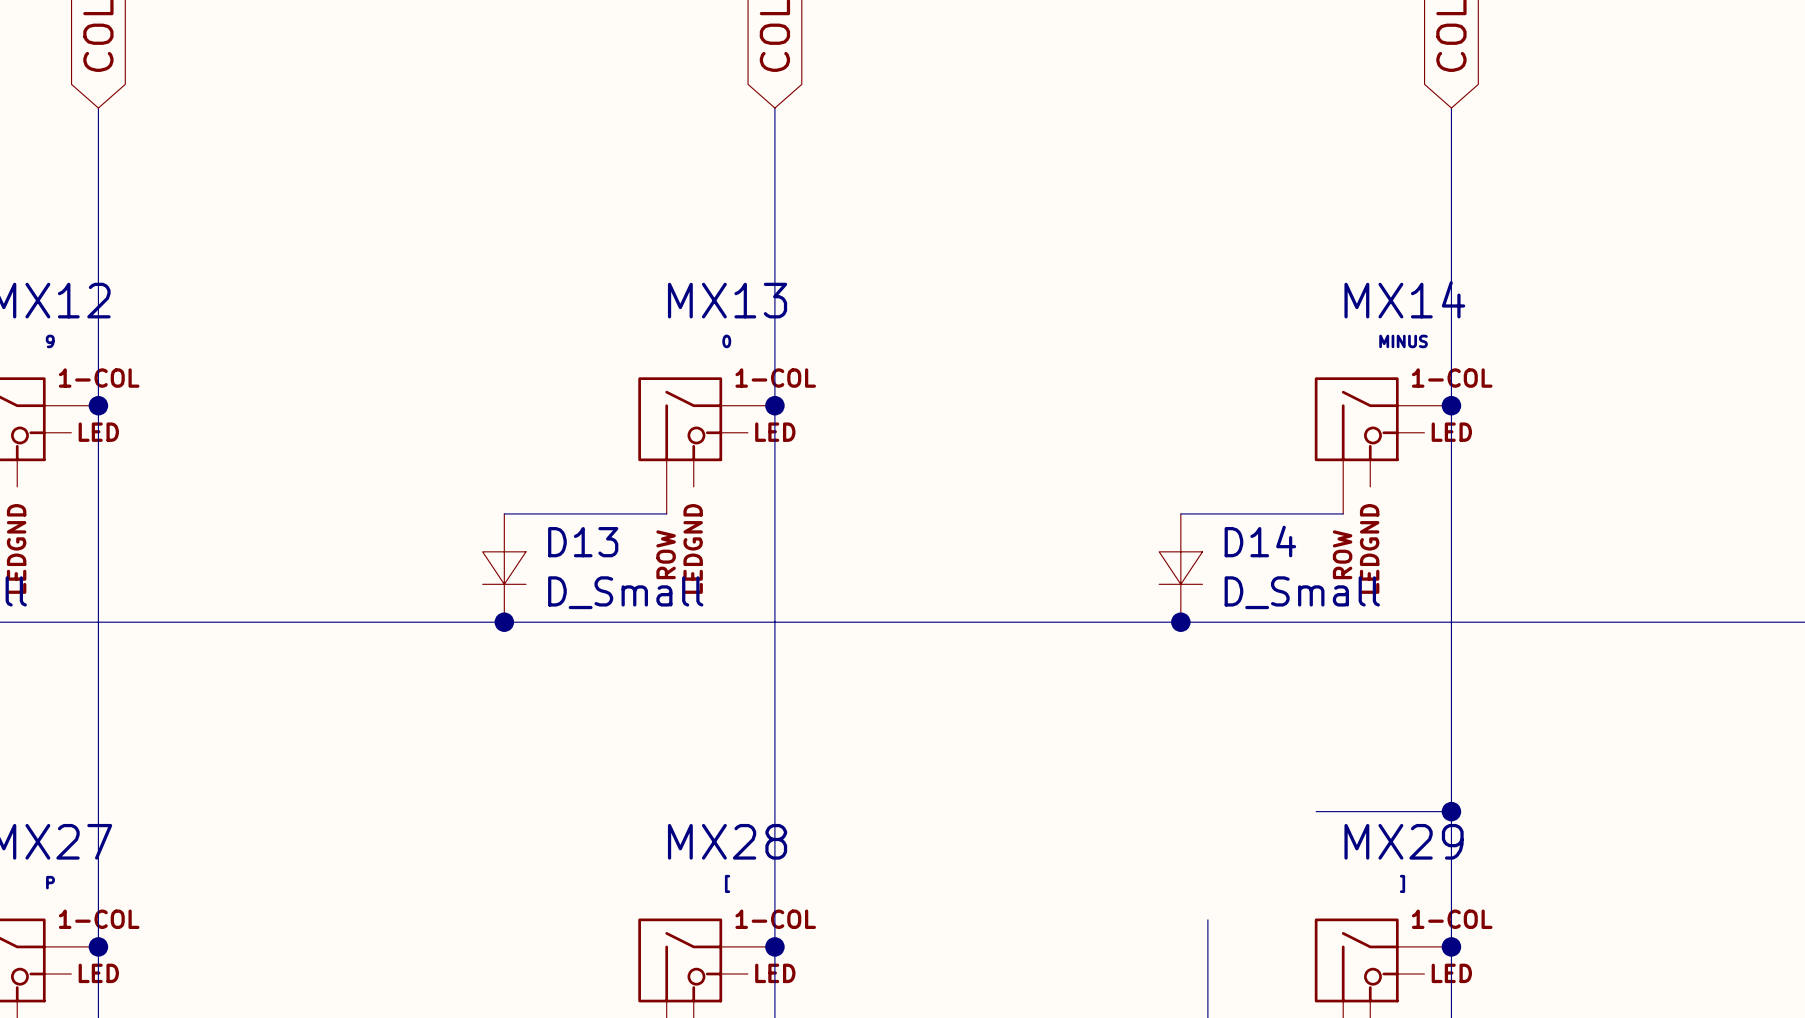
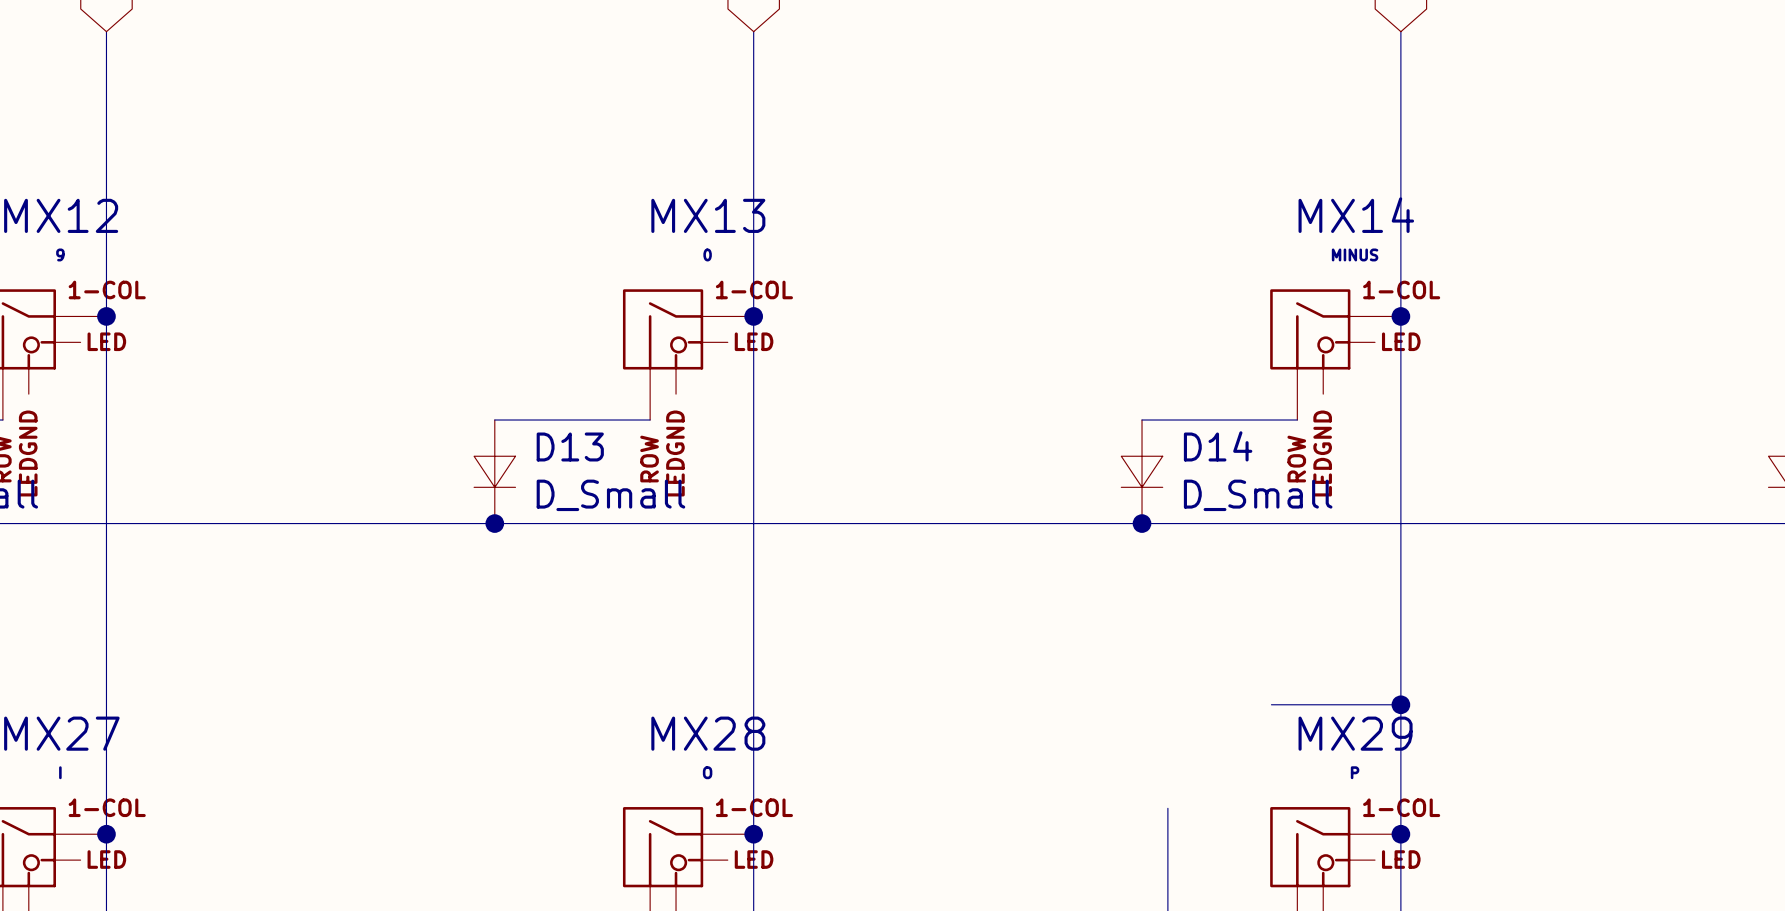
MX27 value: P (50, 882) -> I (60, 772)
MX28 value: [ (727, 883) -> O (707, 772)
MX29 value: ] (1402, 883) -> P (1355, 772)

